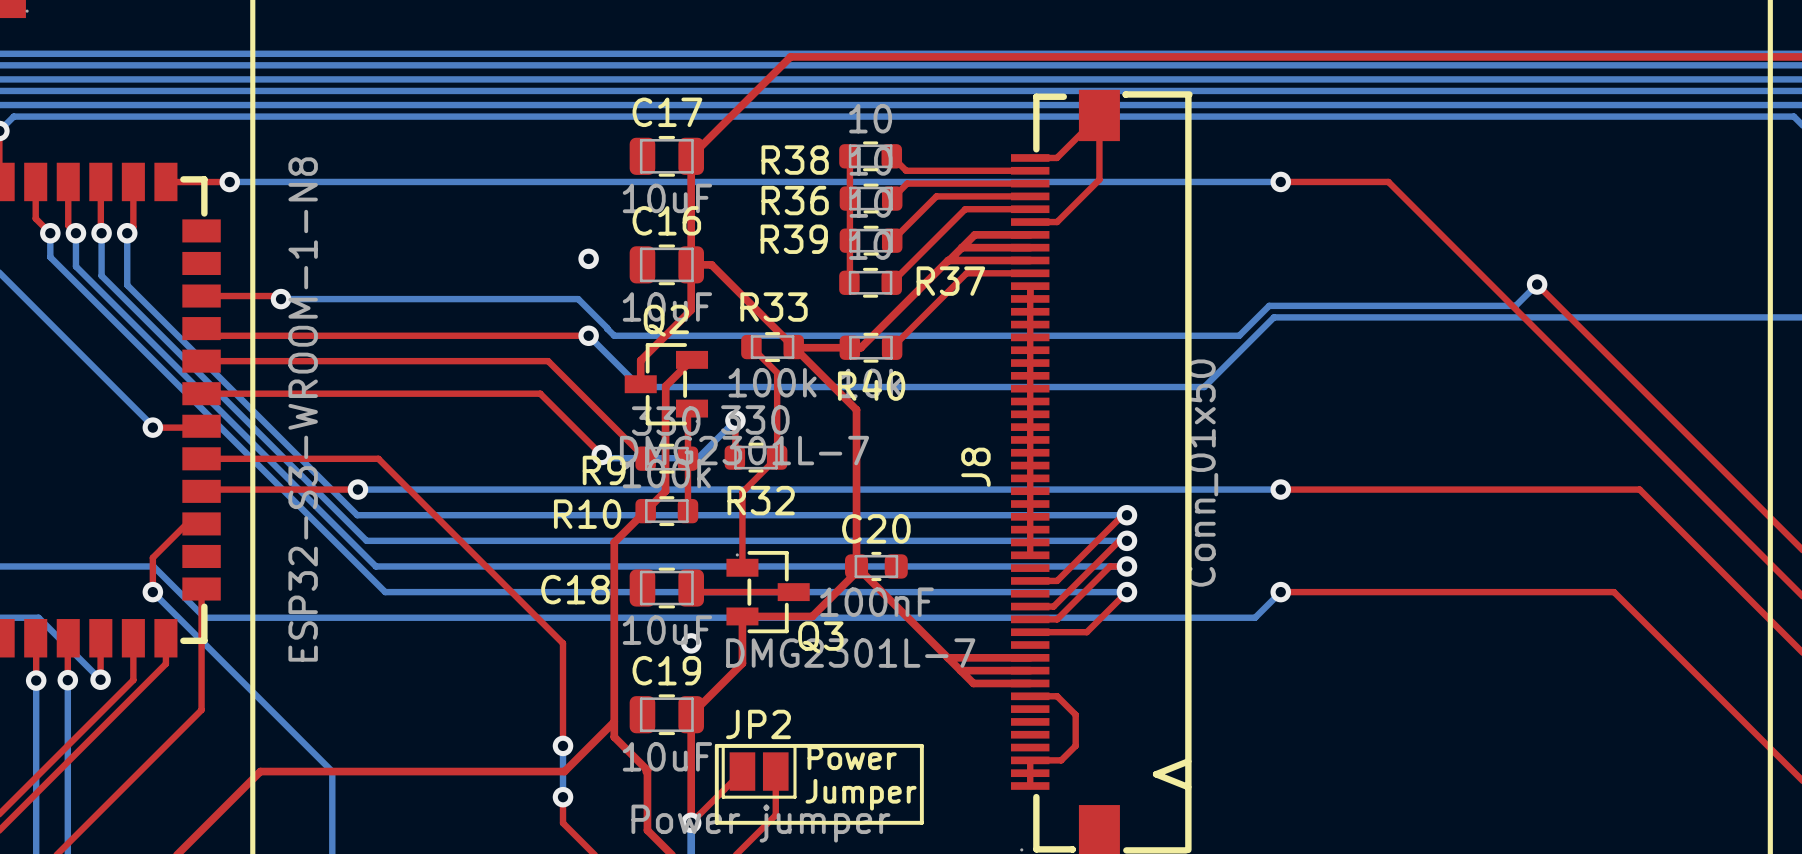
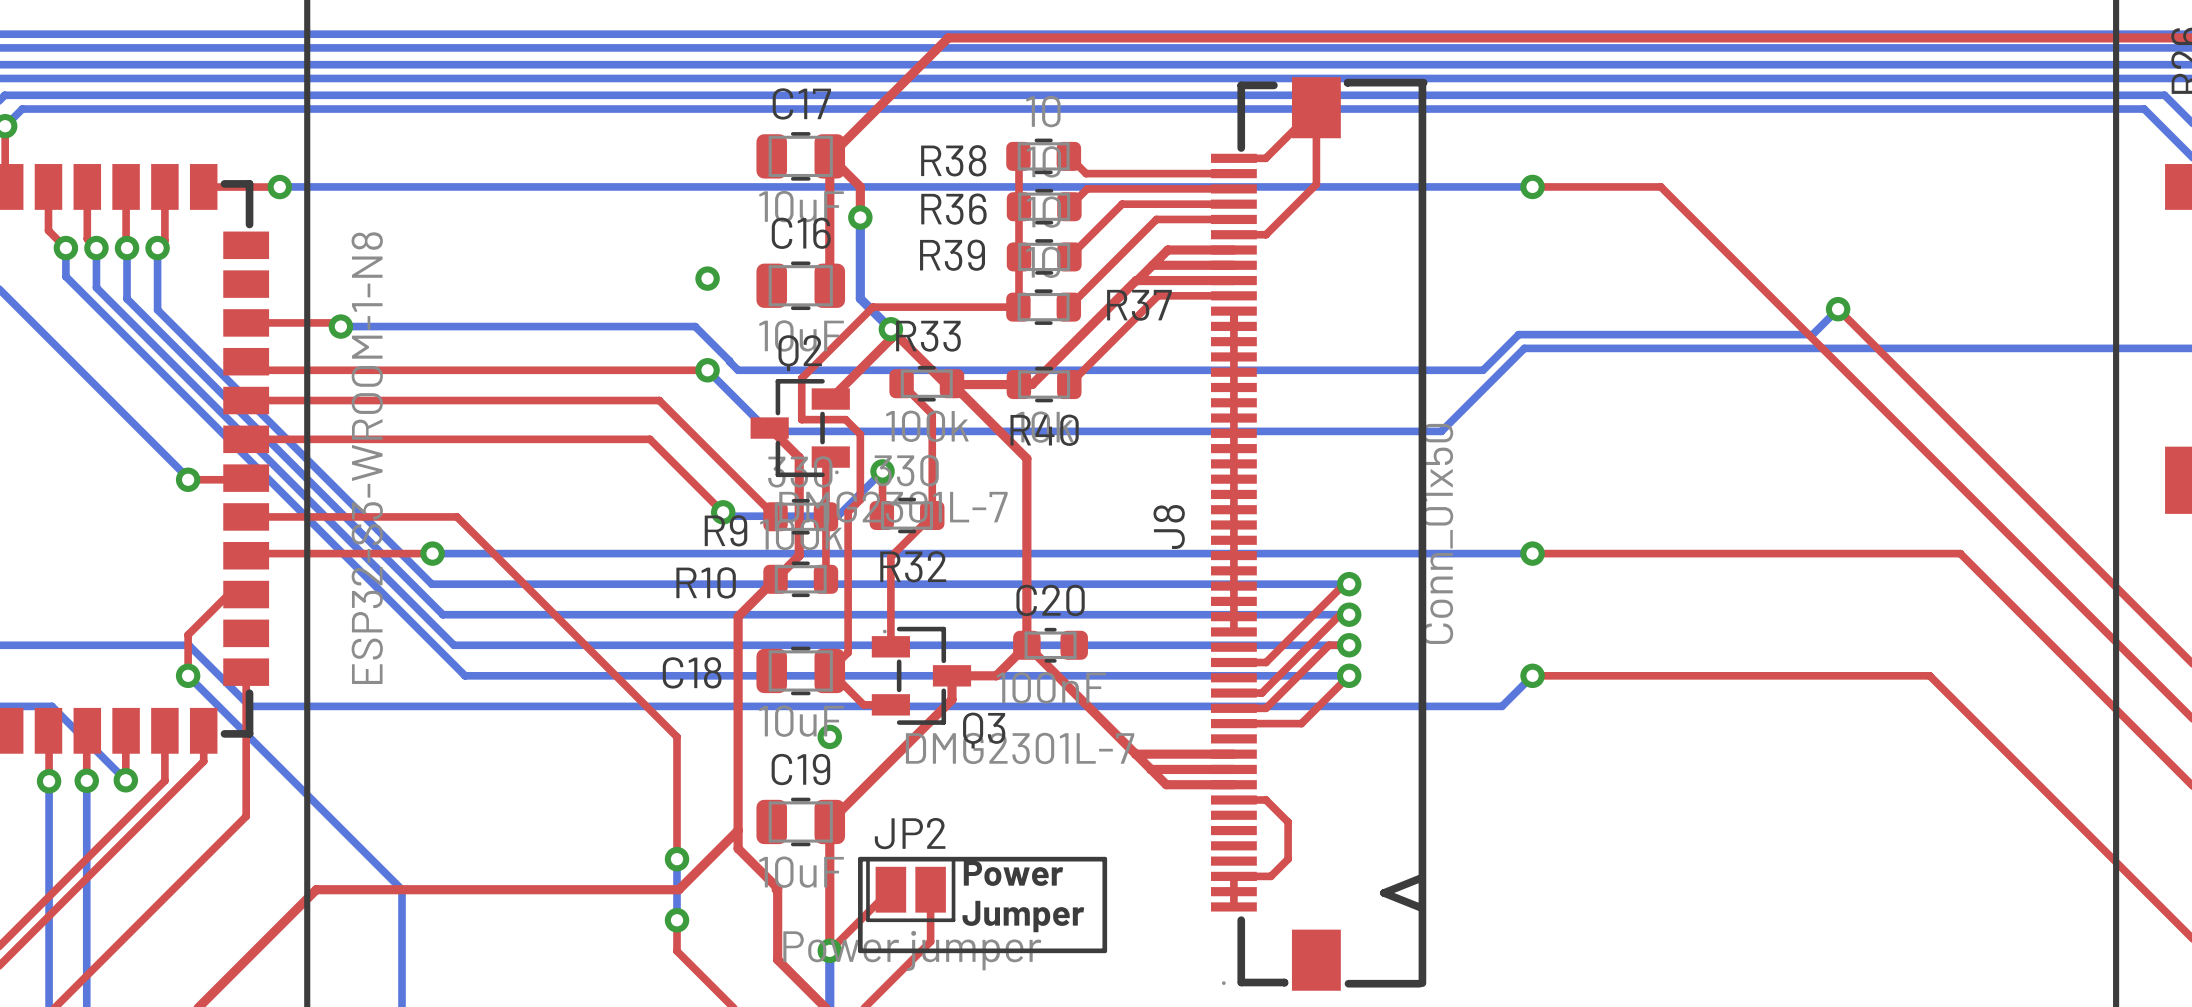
top track: none -> (829, 156) (860, 186) (860, 217)
bottom track: none -> (860, 217) (860, 298) (890, 329)
via: none -> (860, 217)
top track: none -> (1018, 307) (873, 307) (801, 378) (801, 419) (845, 419) (860, 434) (860, 499) (848, 512) (848, 652) (829, 670)
via: none -> (890, 329)
top track: (793, 347) (711, 264) (691, 264) (691, 310) (640, 360) (640, 384) -> (952, 383) (945, 383) (890, 329) (890, 338) (830, 399)
top track: (692, 359) (665, 386) (665, 408) -> (769, 428) (799, 457)
top track: (856, 566) (856, 572) (812, 616) (742, 616) (742, 663) -> (1026, 645) (996, 675) (952, 675) (952, 699) (890, 760)
top track: (695, 592) (793, 592) -> (834, 675) (863, 704) (890, 704)

